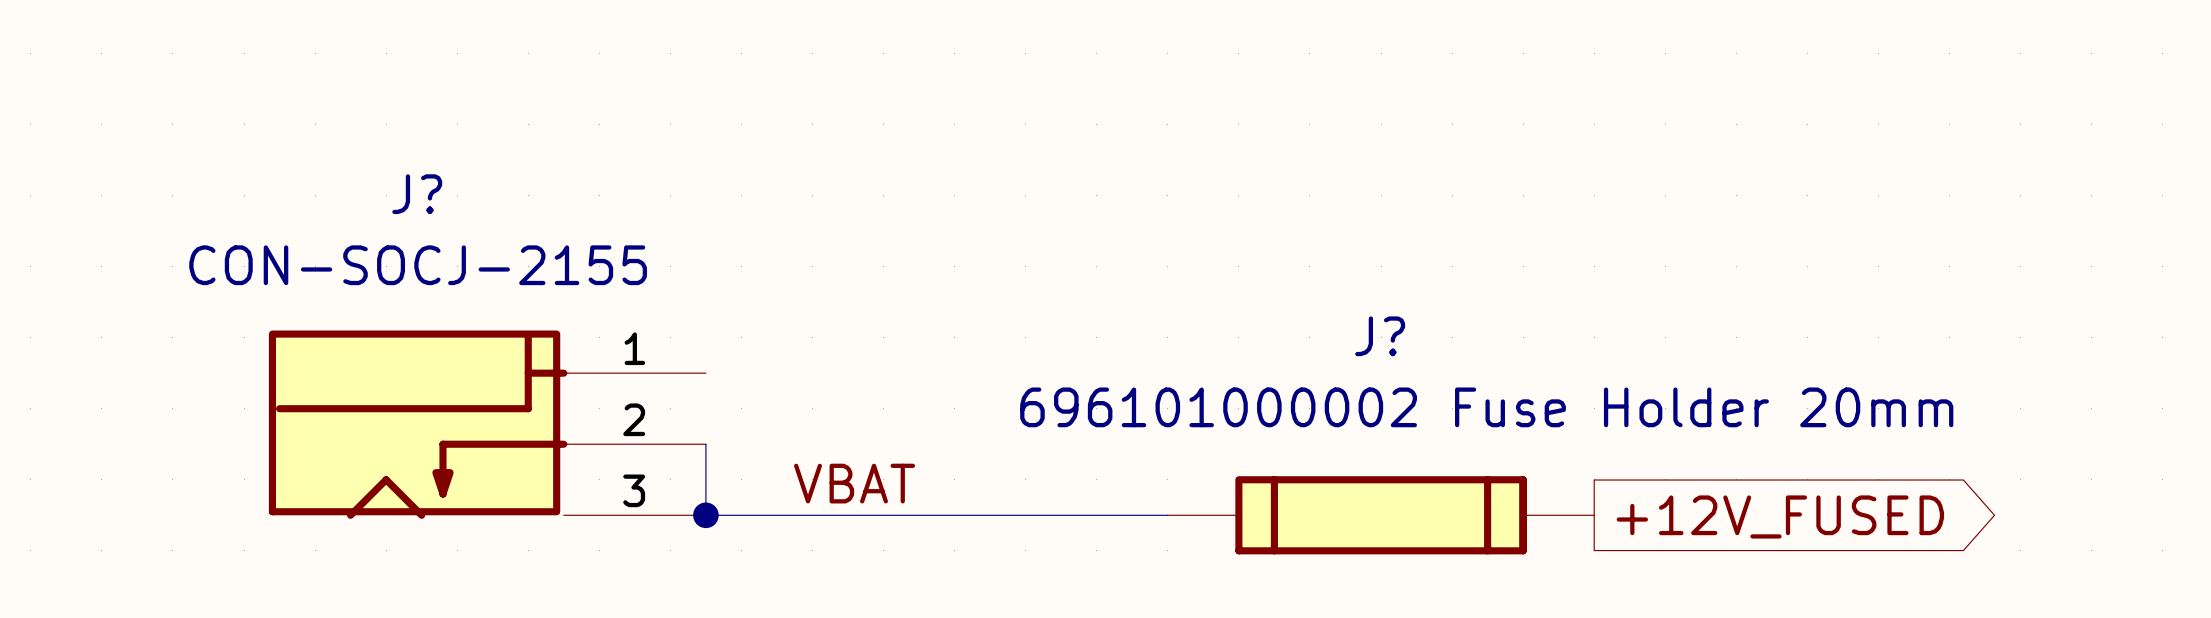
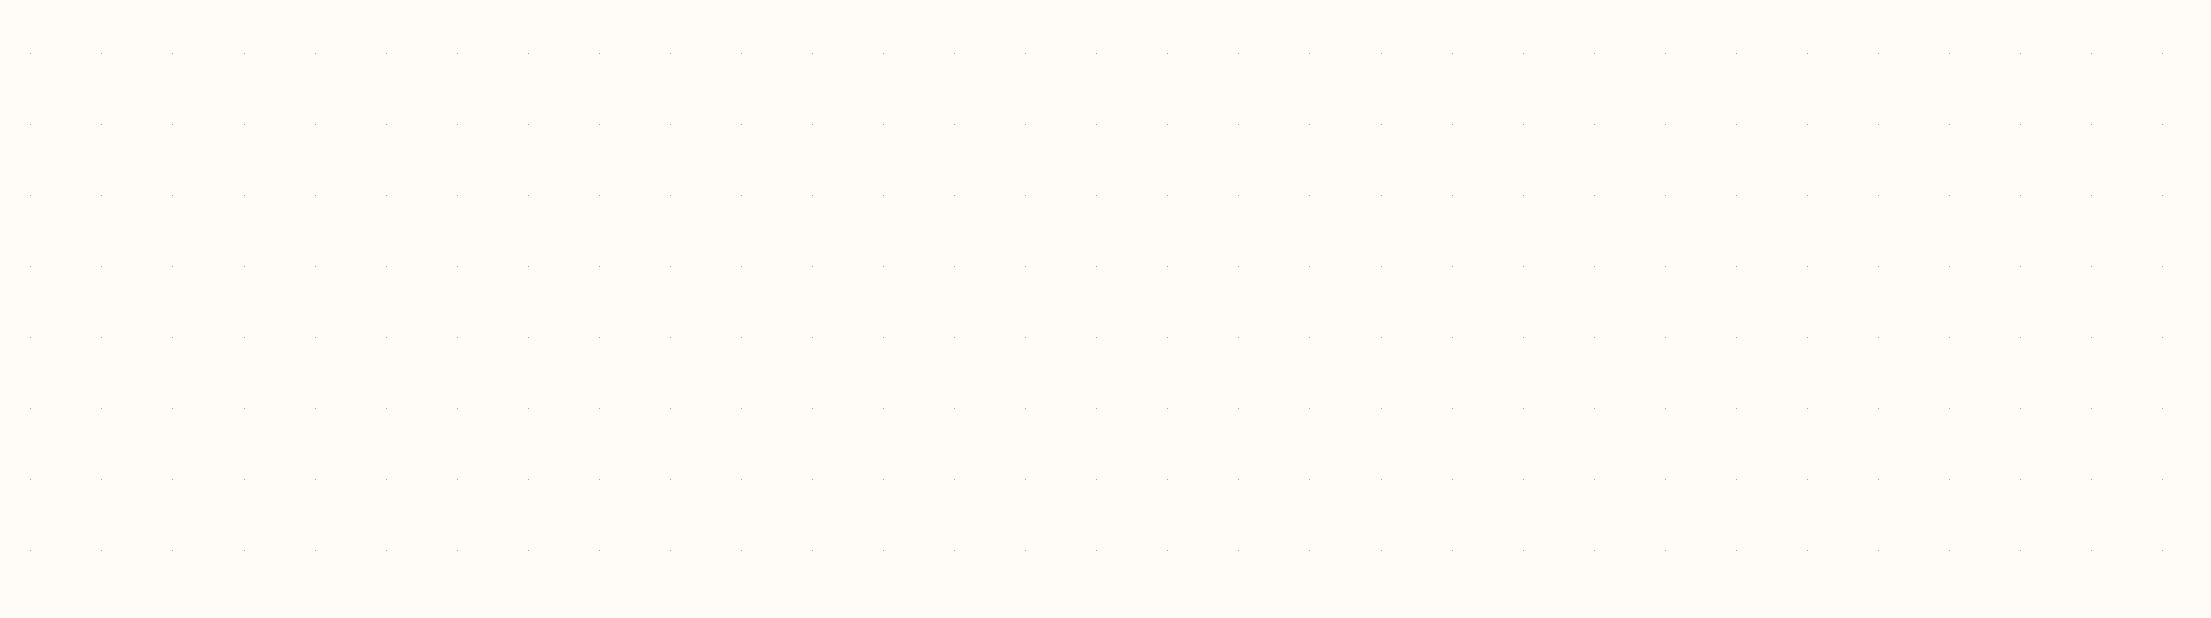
J?: CON-SOCJ-2155 (487, 424) -> none
wire: (705, 444) (705, 515) (1167, 515) -> none
label: VBAT (854, 483) -> none
junction: (705, 515) -> none
J?: 696101000002 Fuse Holder 20mm (1381, 515) -> none
global label: +12V_FUSED (1780, 516) -> none

